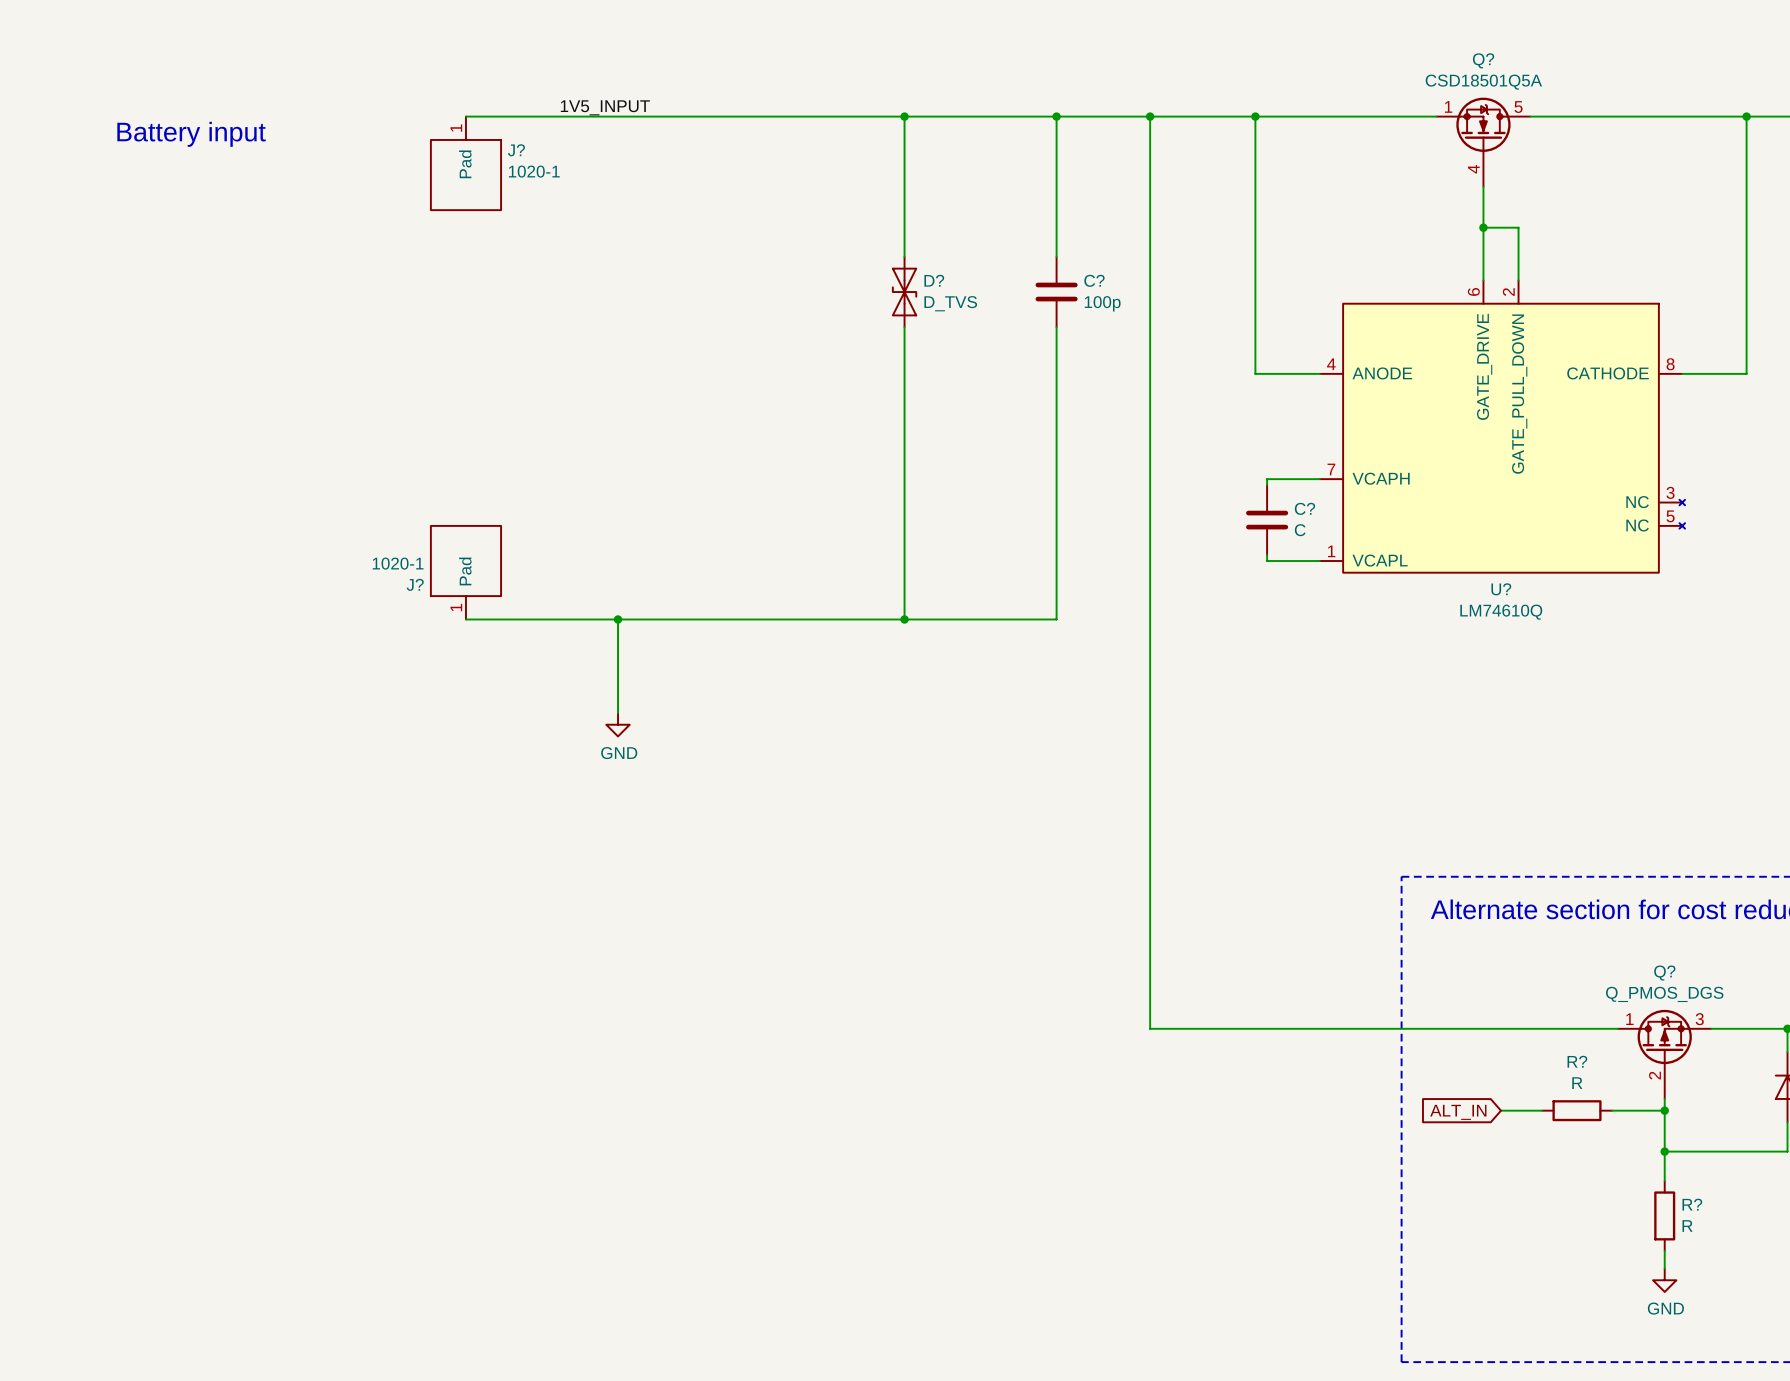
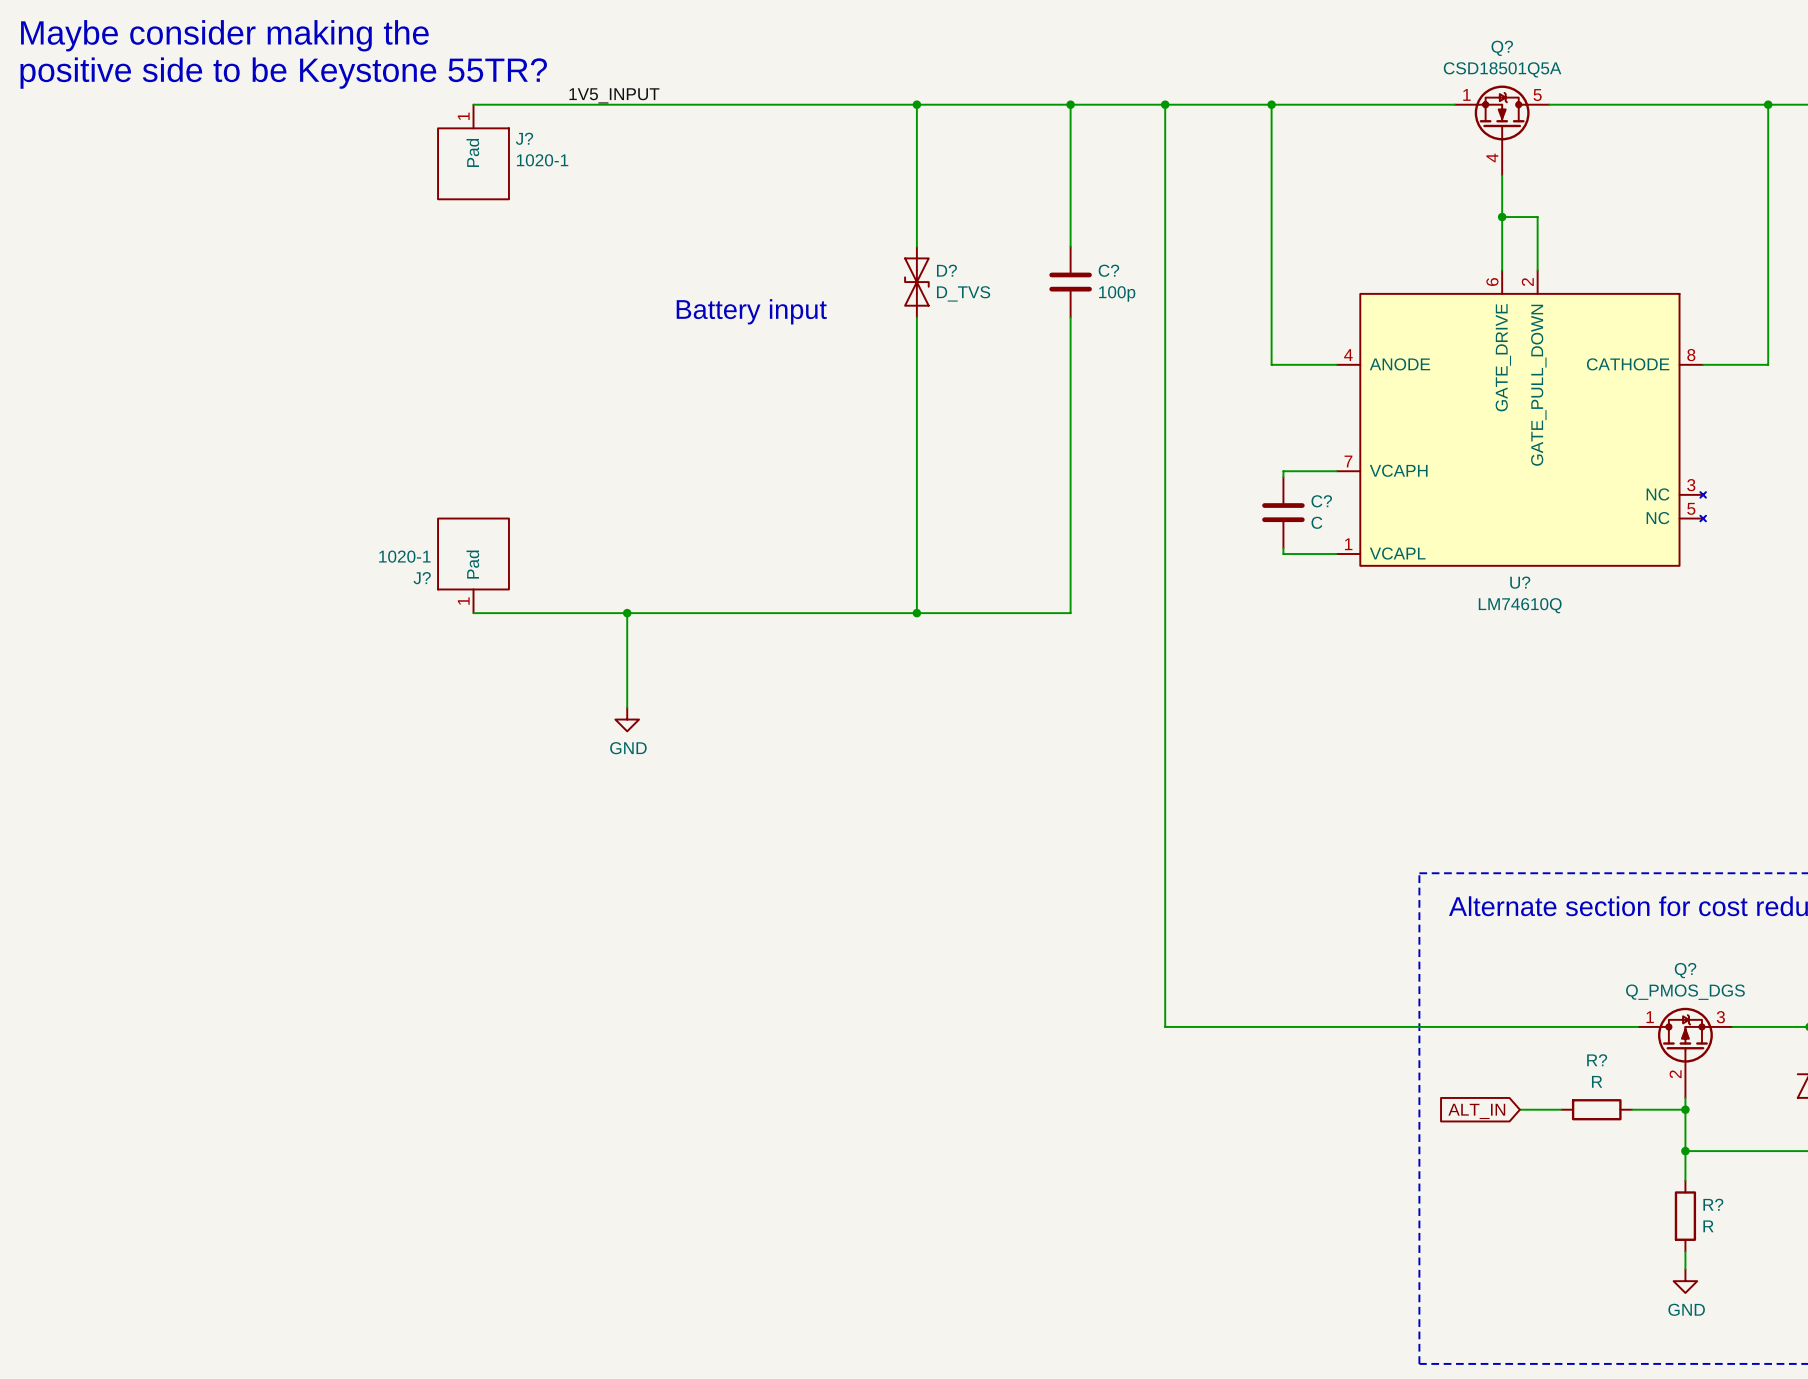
text: none -> Maybe consider making the (224, 35)
text: none -> positive side to be Keystone 55TR? (283, 73)
text: Battery input (191, 134) -> none
text: none -> Battery input (751, 311)

